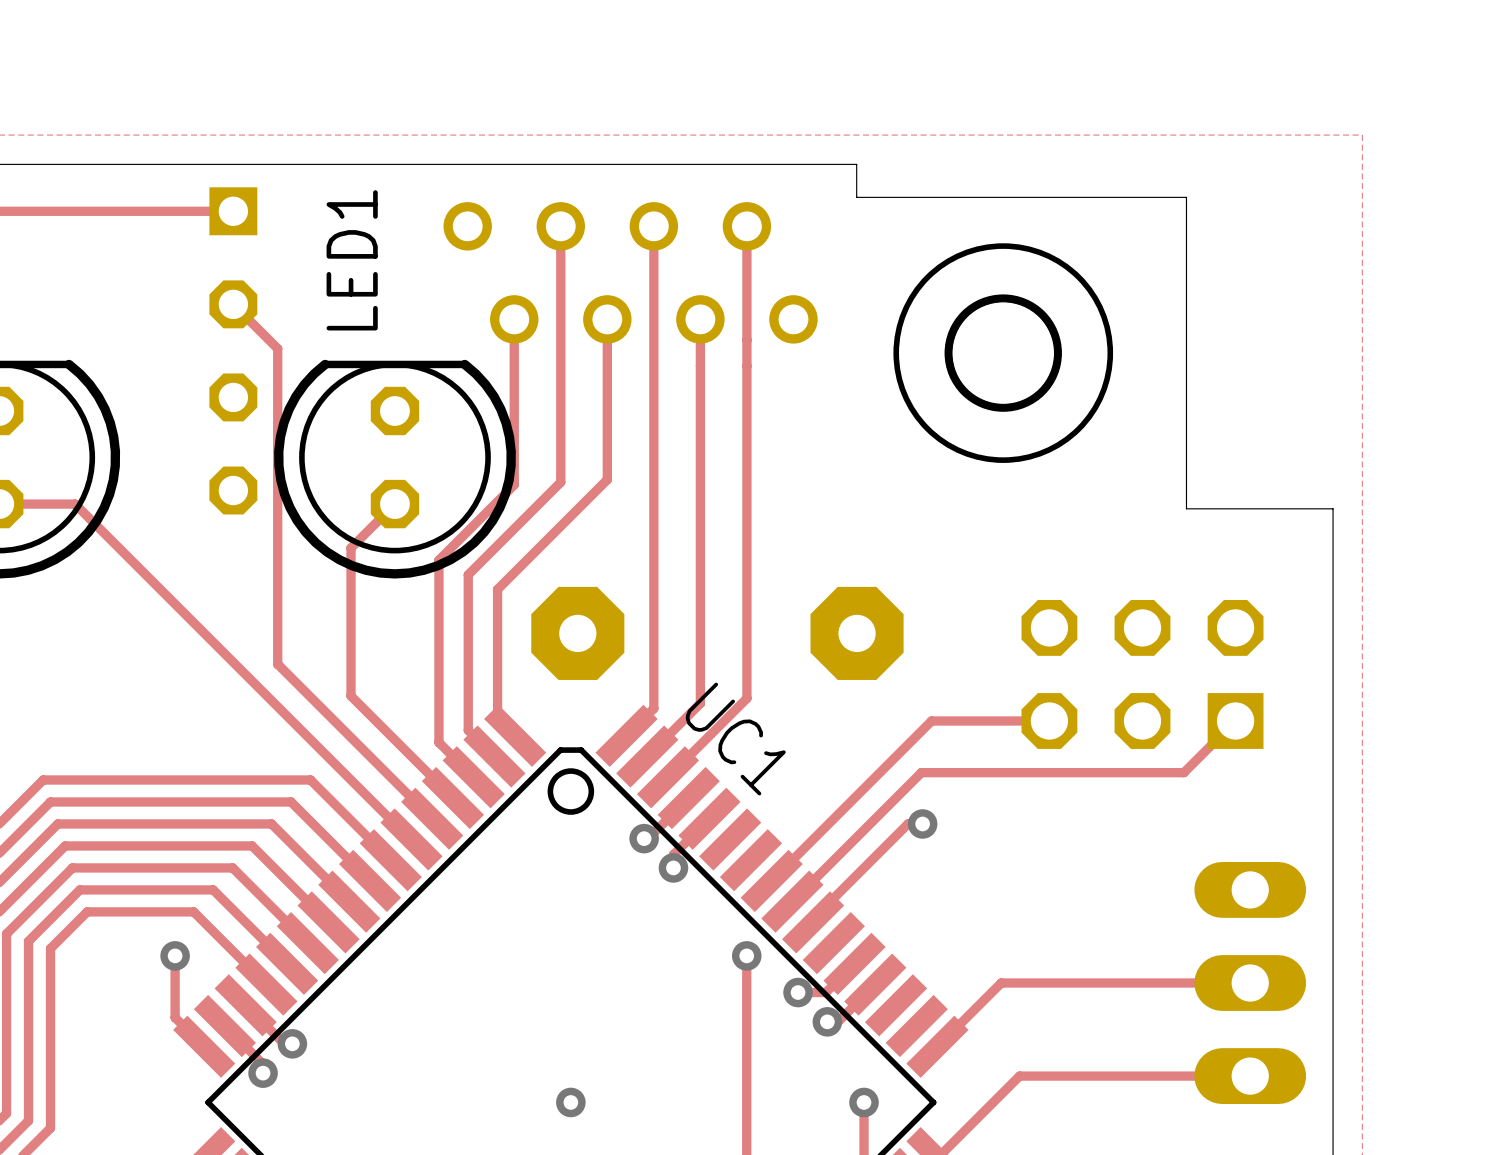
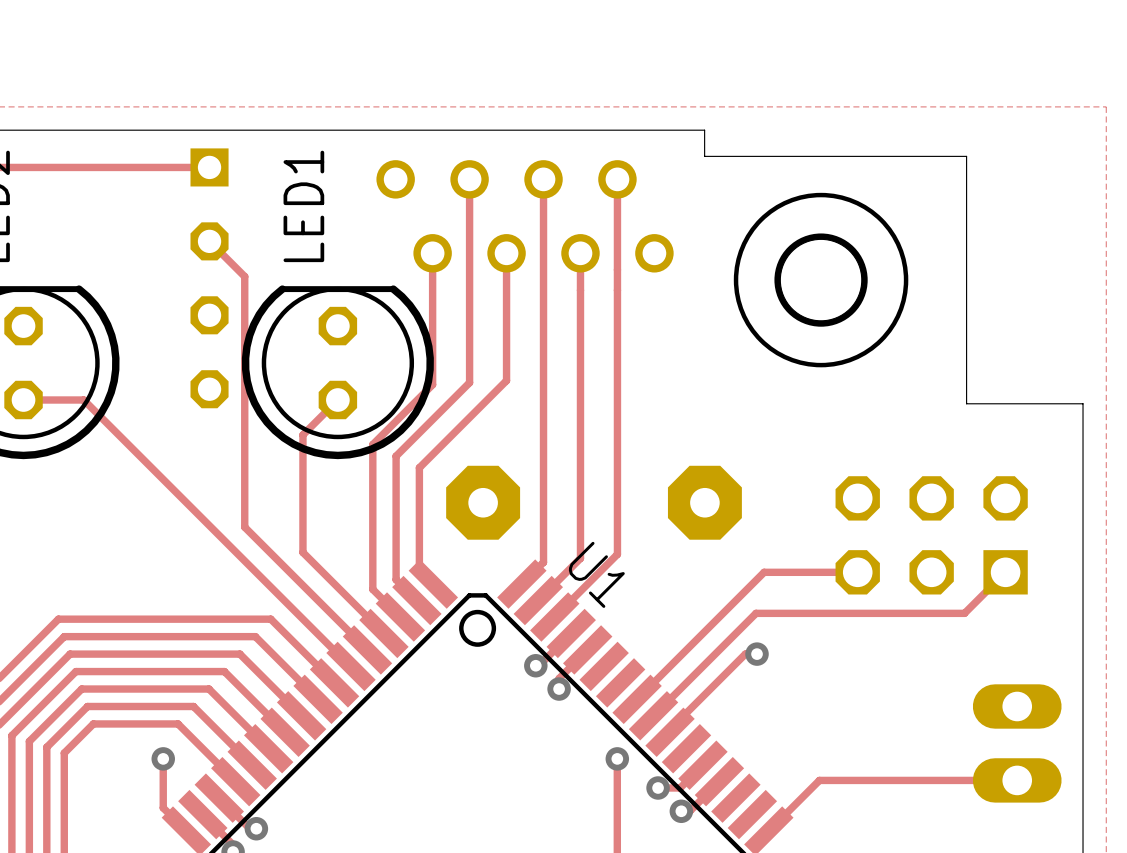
UC1 name: UC1 (735, 739) -> U1 (596, 574)

